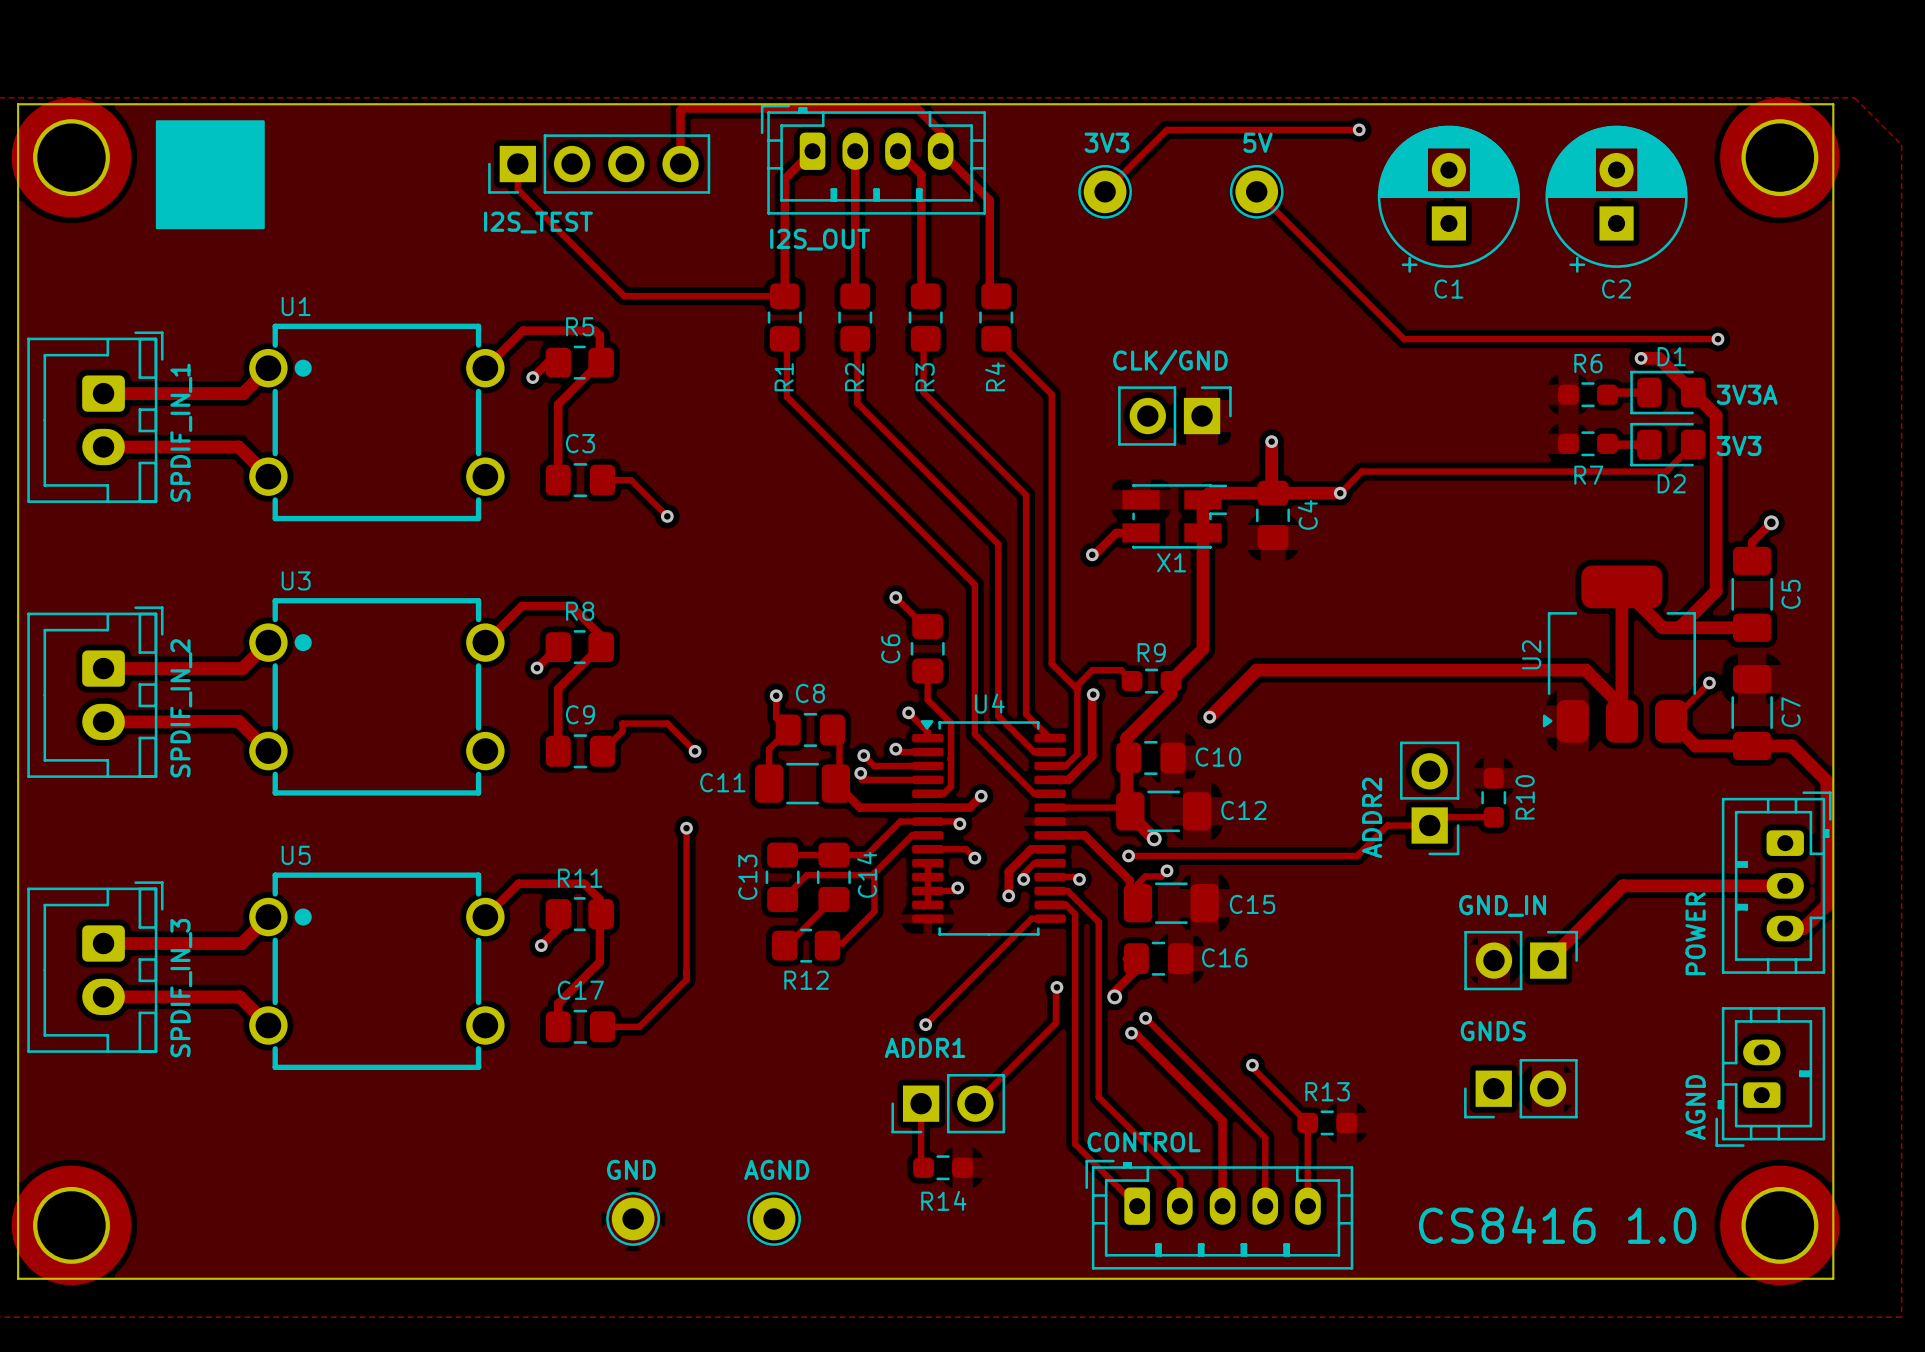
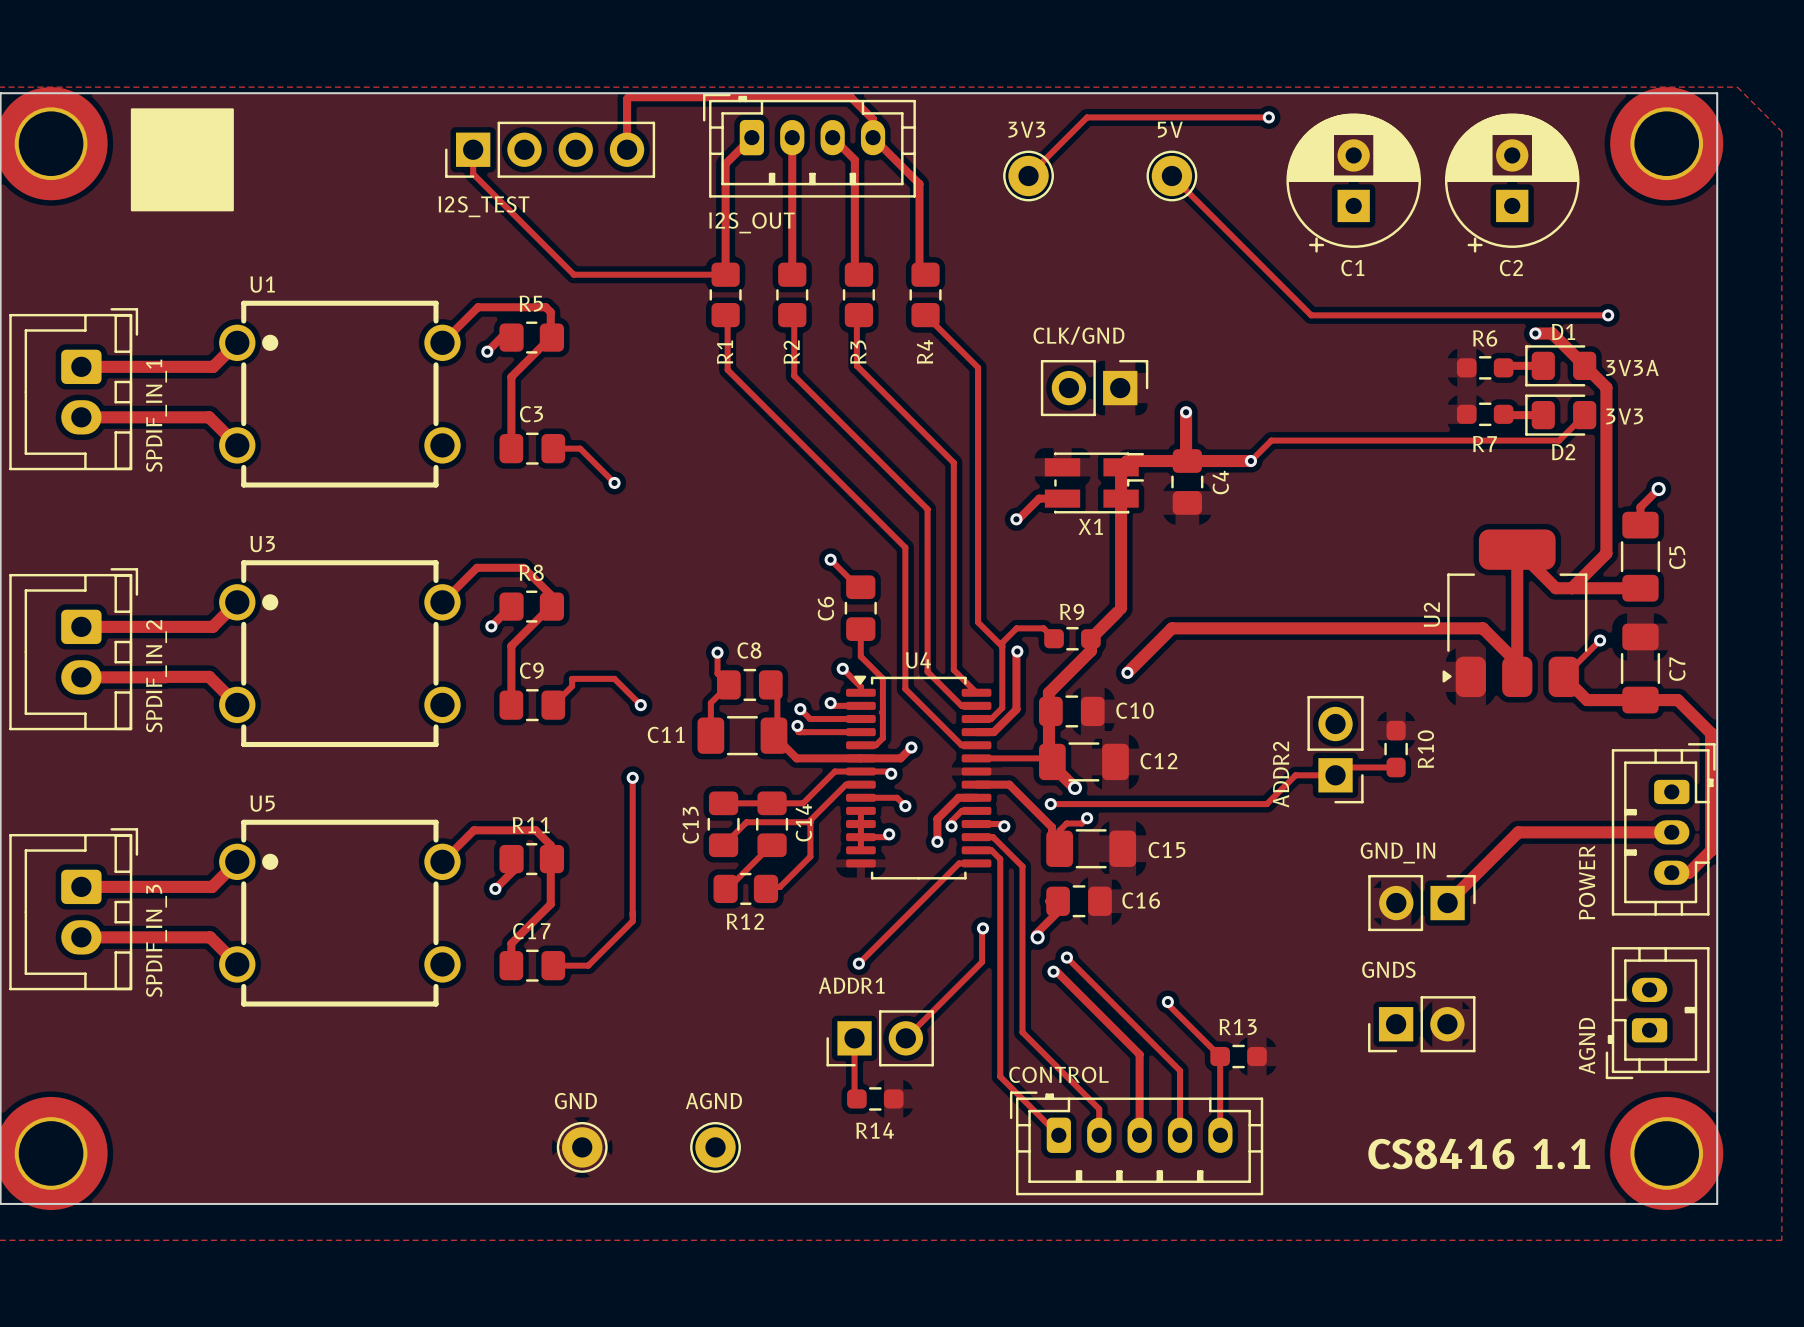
text: CS8416 1.0 (1557, 1224) -> CS8416 1.1 (1479, 1153)

